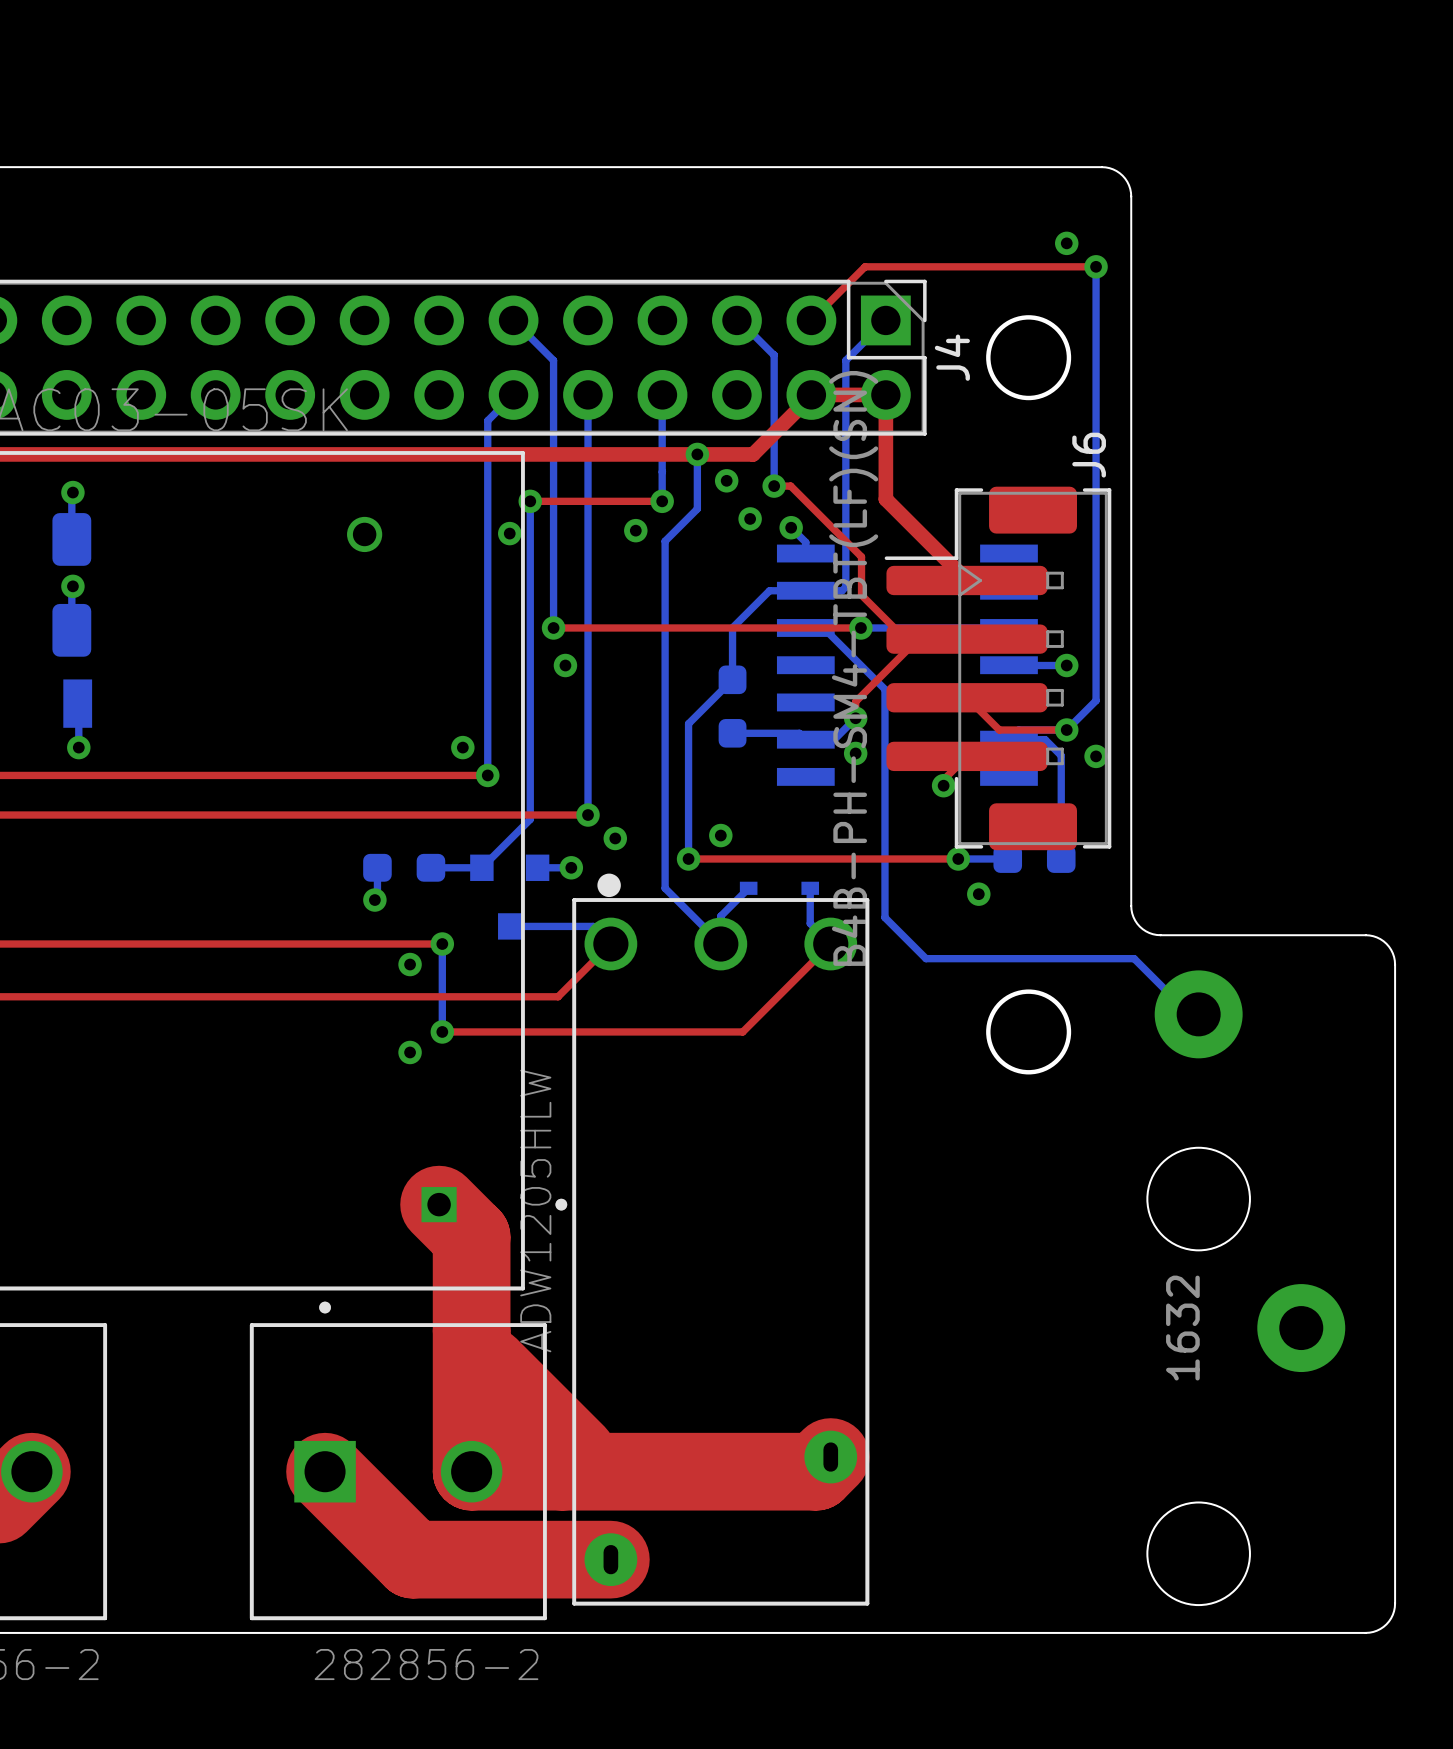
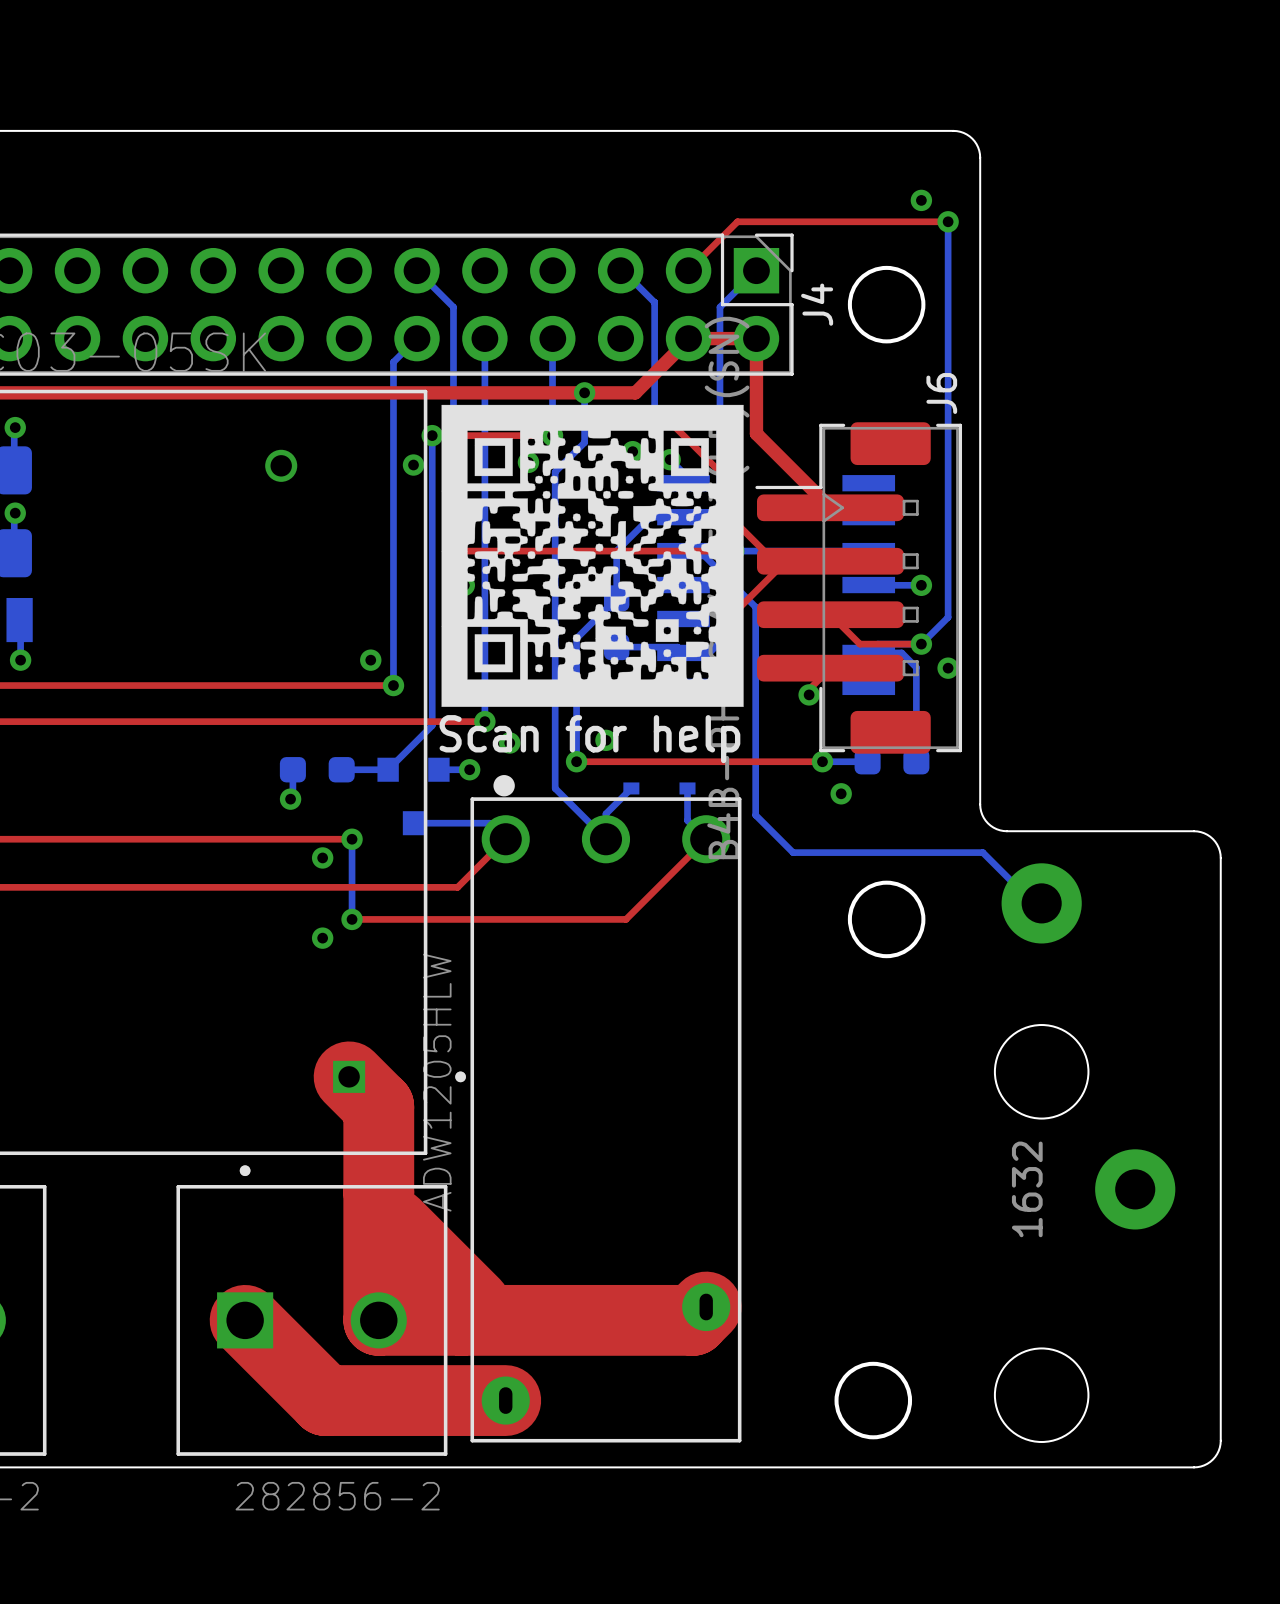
drawing: none -> [441, 404, 744, 707]
text: none -> Scan for help (589, 739)
round board edge: none -> [834, 1361, 913, 1440]

